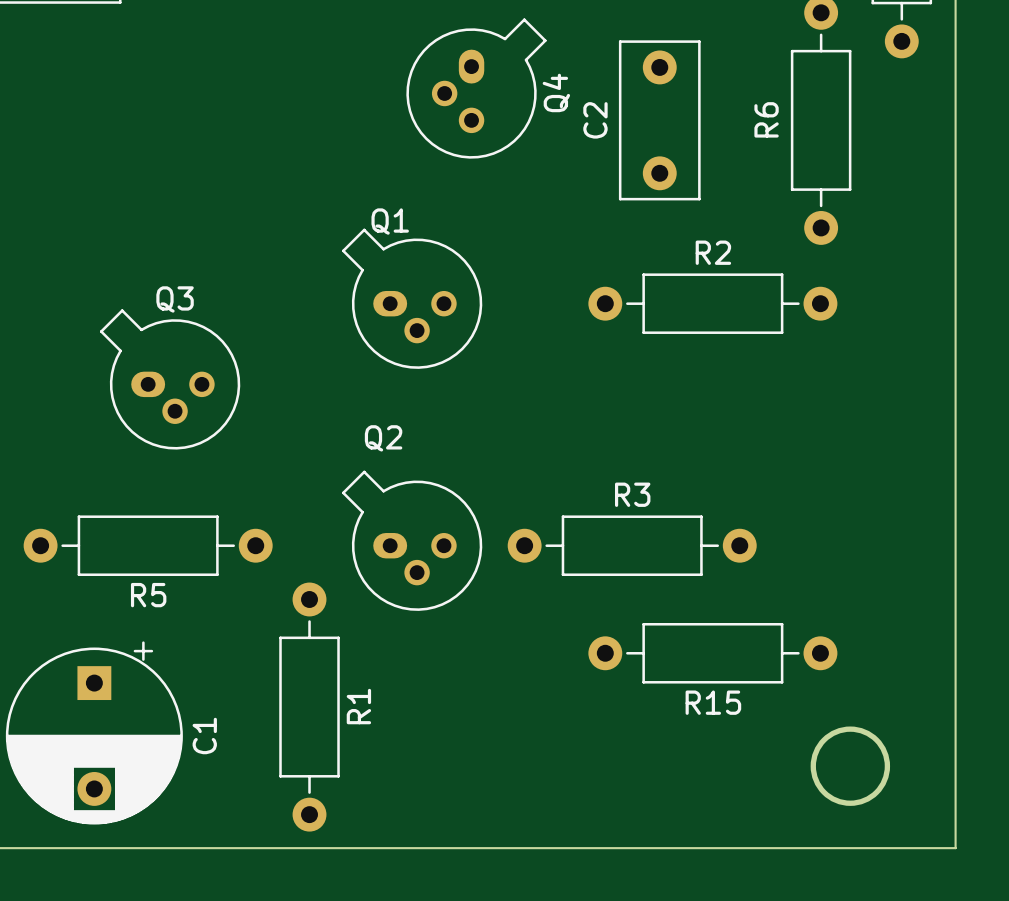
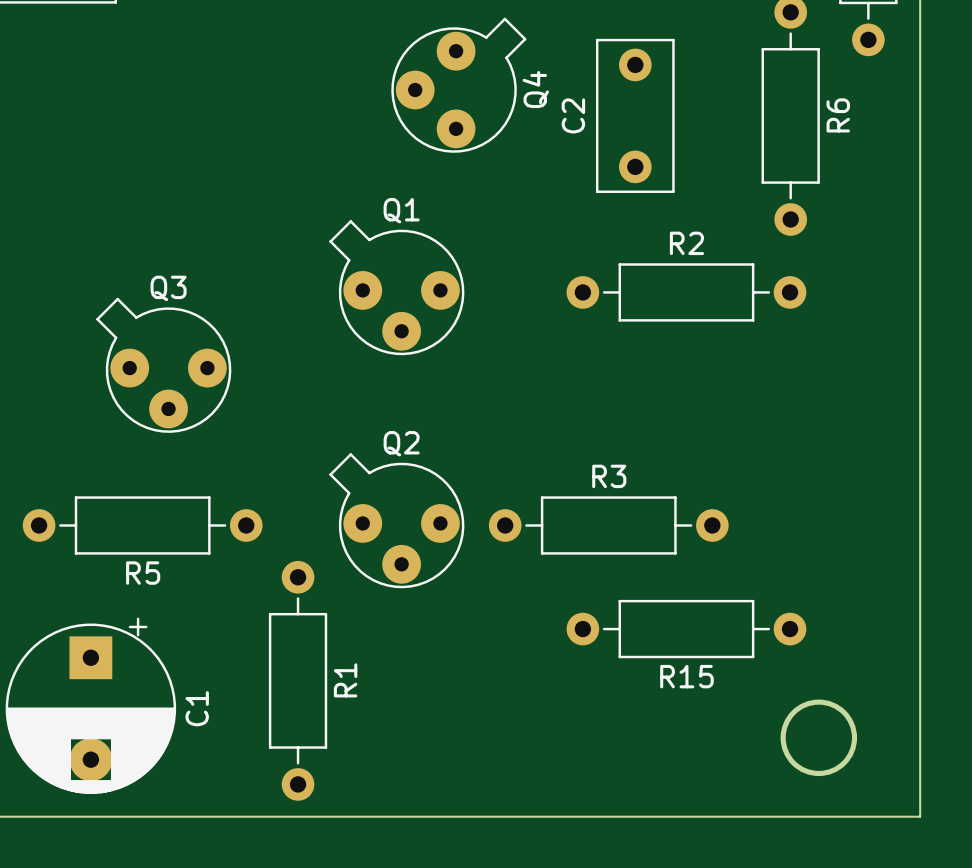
Q4 footprint: [406, 18, 547, 159] -> [391, 17, 527, 153]
R6 name position: R6 (766, 119) -> R6 (838, 115)
Q1 footprint: [342, 228, 483, 369] -> [329, 220, 465, 356]
Q3 footprint: [100, 309, 241, 450] -> [96, 297, 232, 433]
Q2 footprint: [342, 470, 483, 611] -> [329, 453, 465, 589]
C1 footprint: [5, 641, 183, 825] -> [5, 617, 177, 794]

